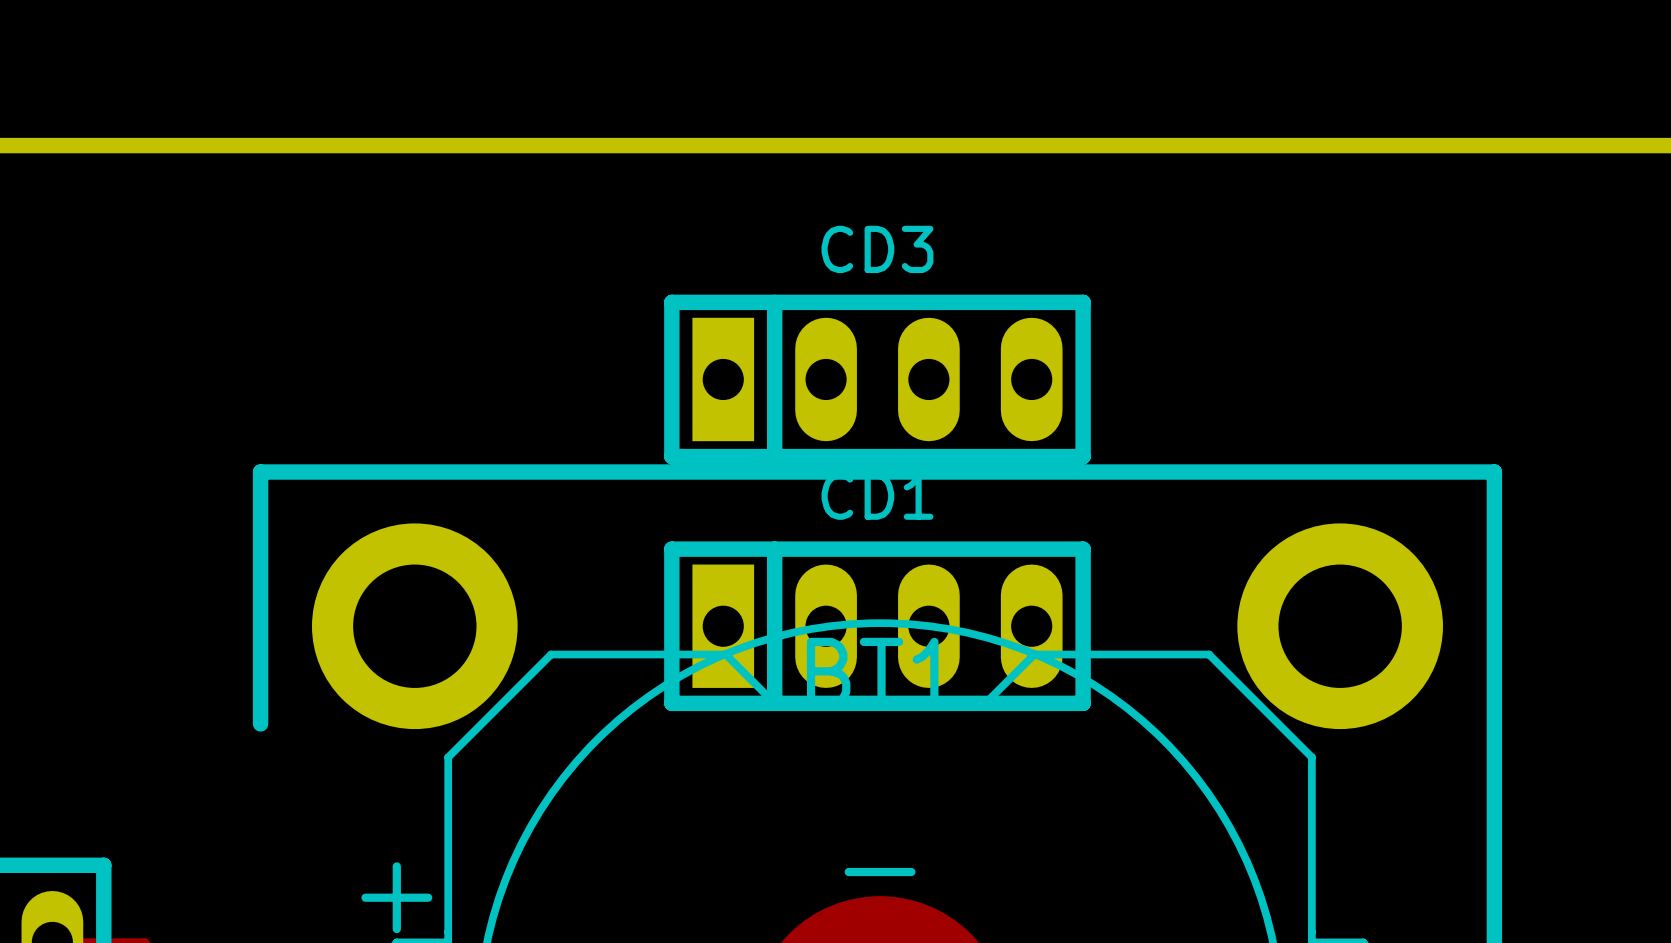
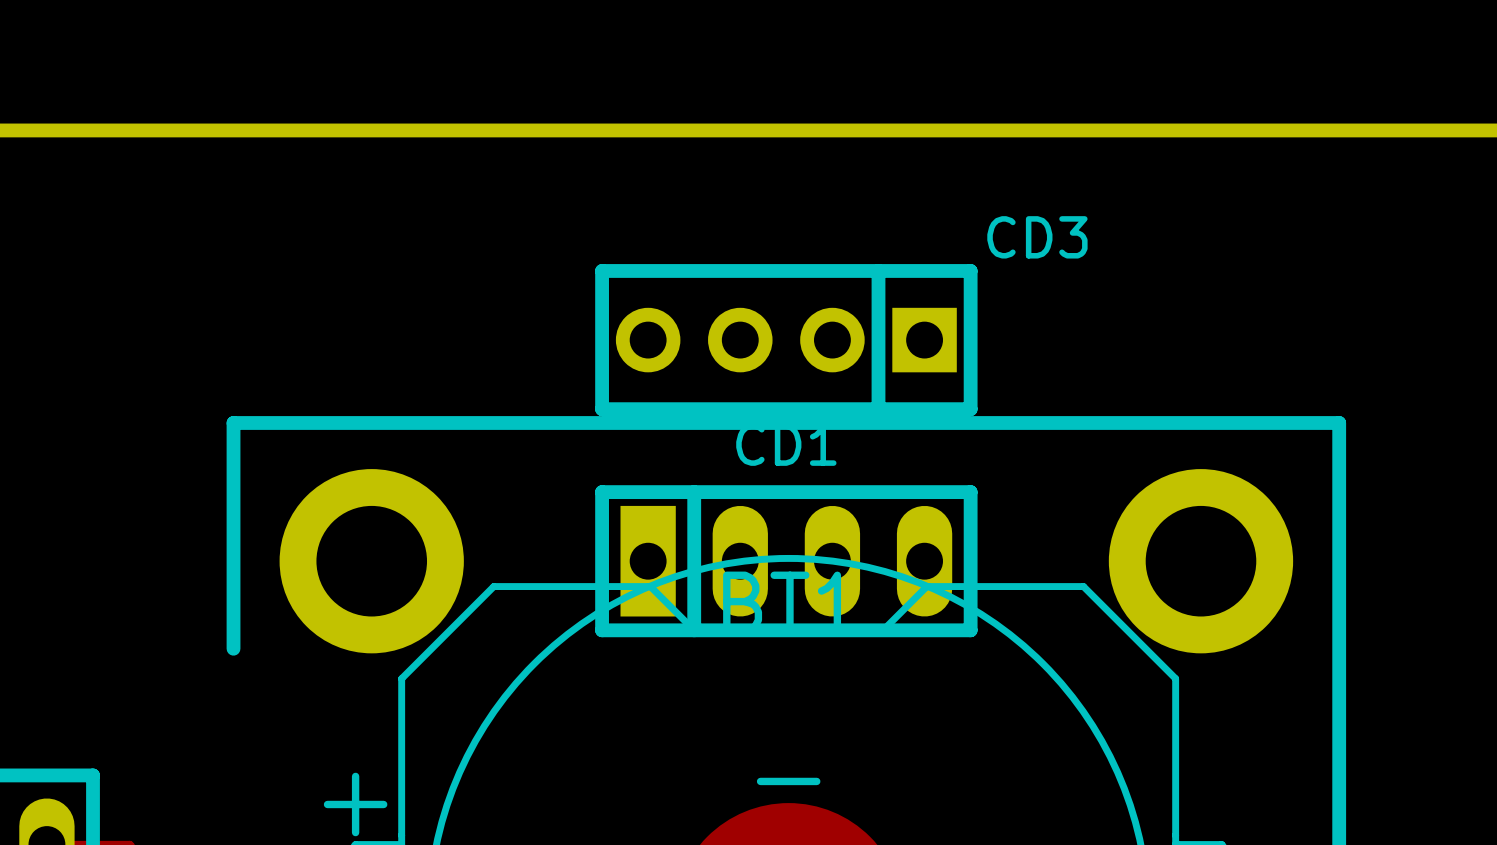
CD3 name position: CD3 (877, 249) -> CD3 (1037, 237)
CD3 footprint: [664, 294, 1091, 465] -> [595, 264, 978, 417]

